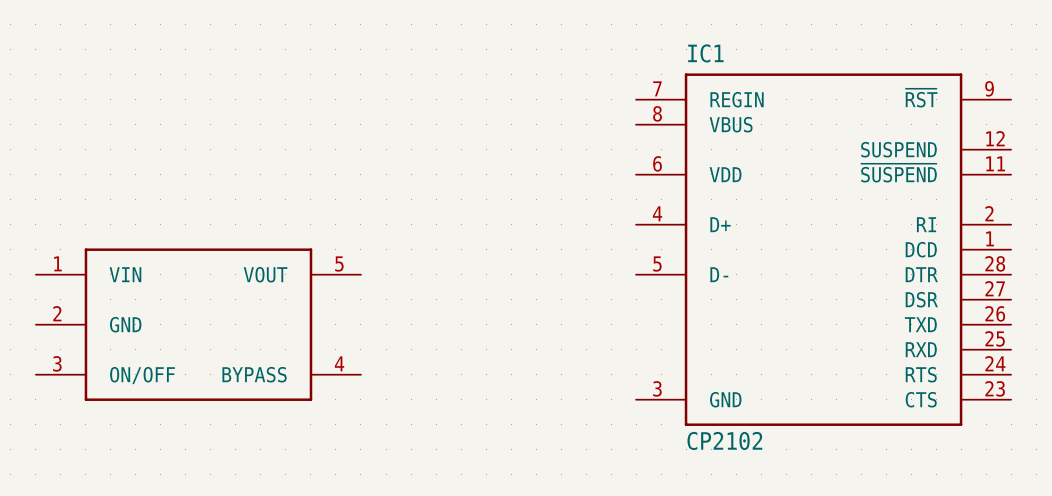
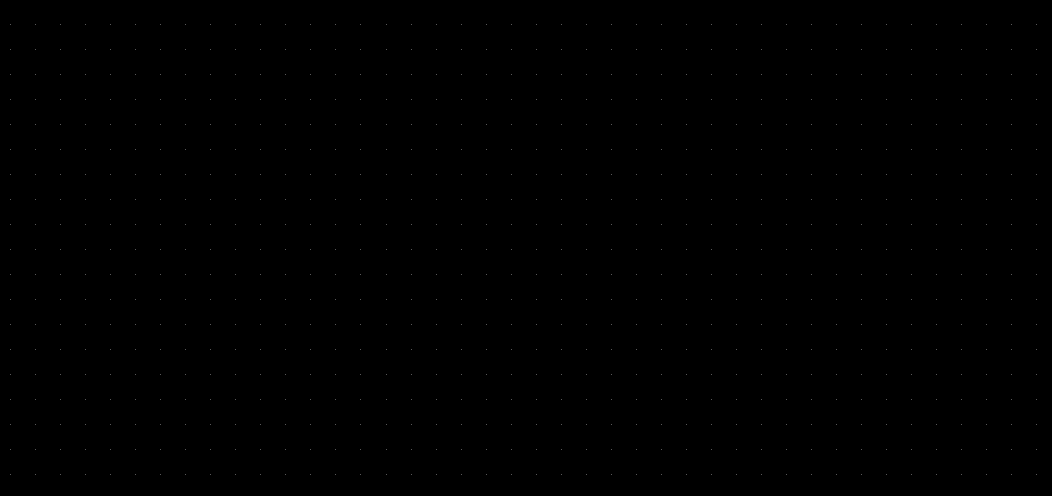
IC1: CP2102 (823, 249) -> none
part: (198, 324) -> none

